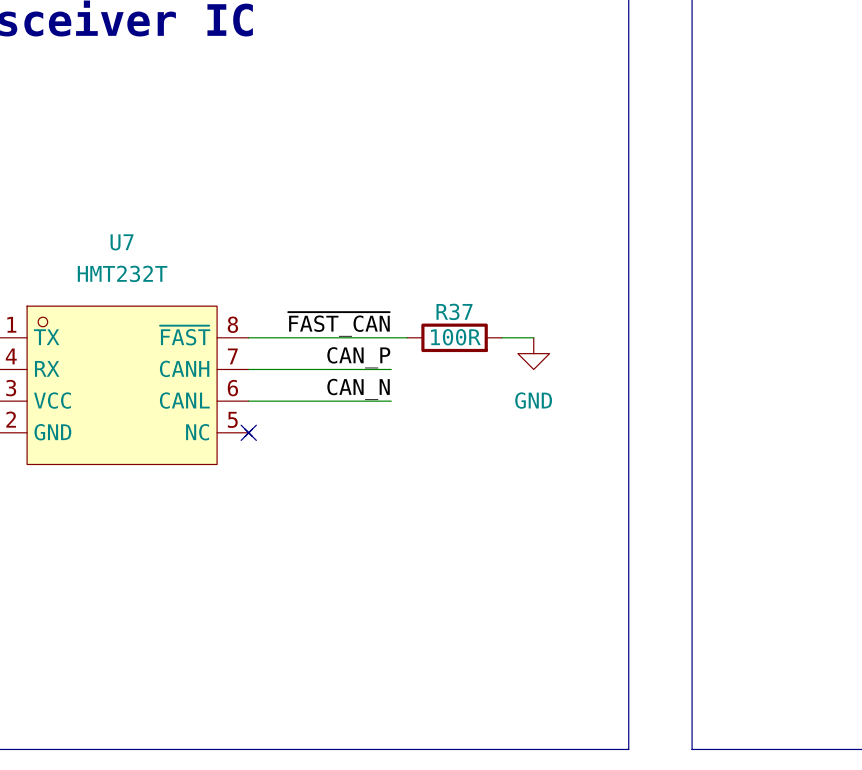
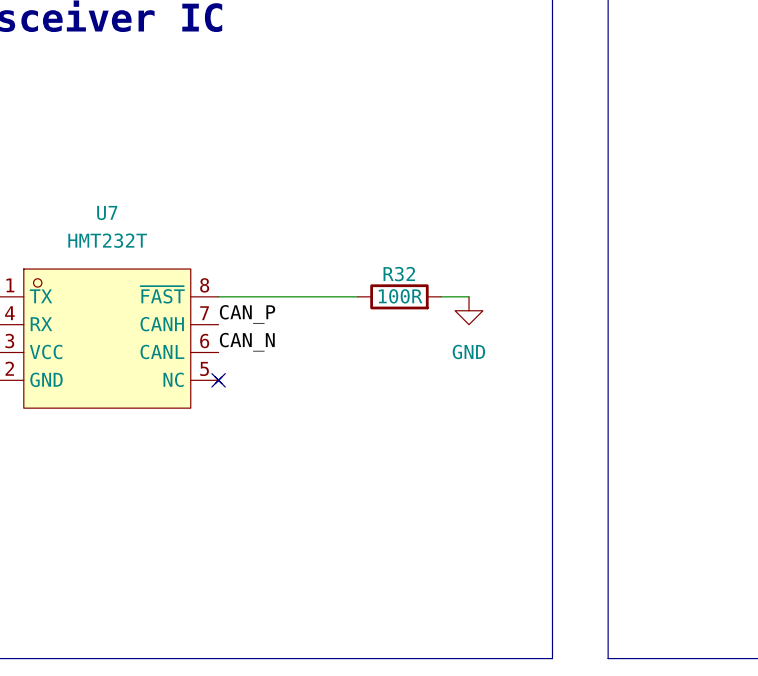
R37 name: R37 (454, 311) -> R32 (399, 274)
label: ~{FAST_CAN} (339, 324) -> none
label position: CAN_P (358, 357) -> CAN_P (247, 314)
wire: (248, 369) (391, 369) -> none
label position: CAN_N (358, 389) -> CAN_N (247, 342)
wire: (248, 401) (391, 401) -> none

